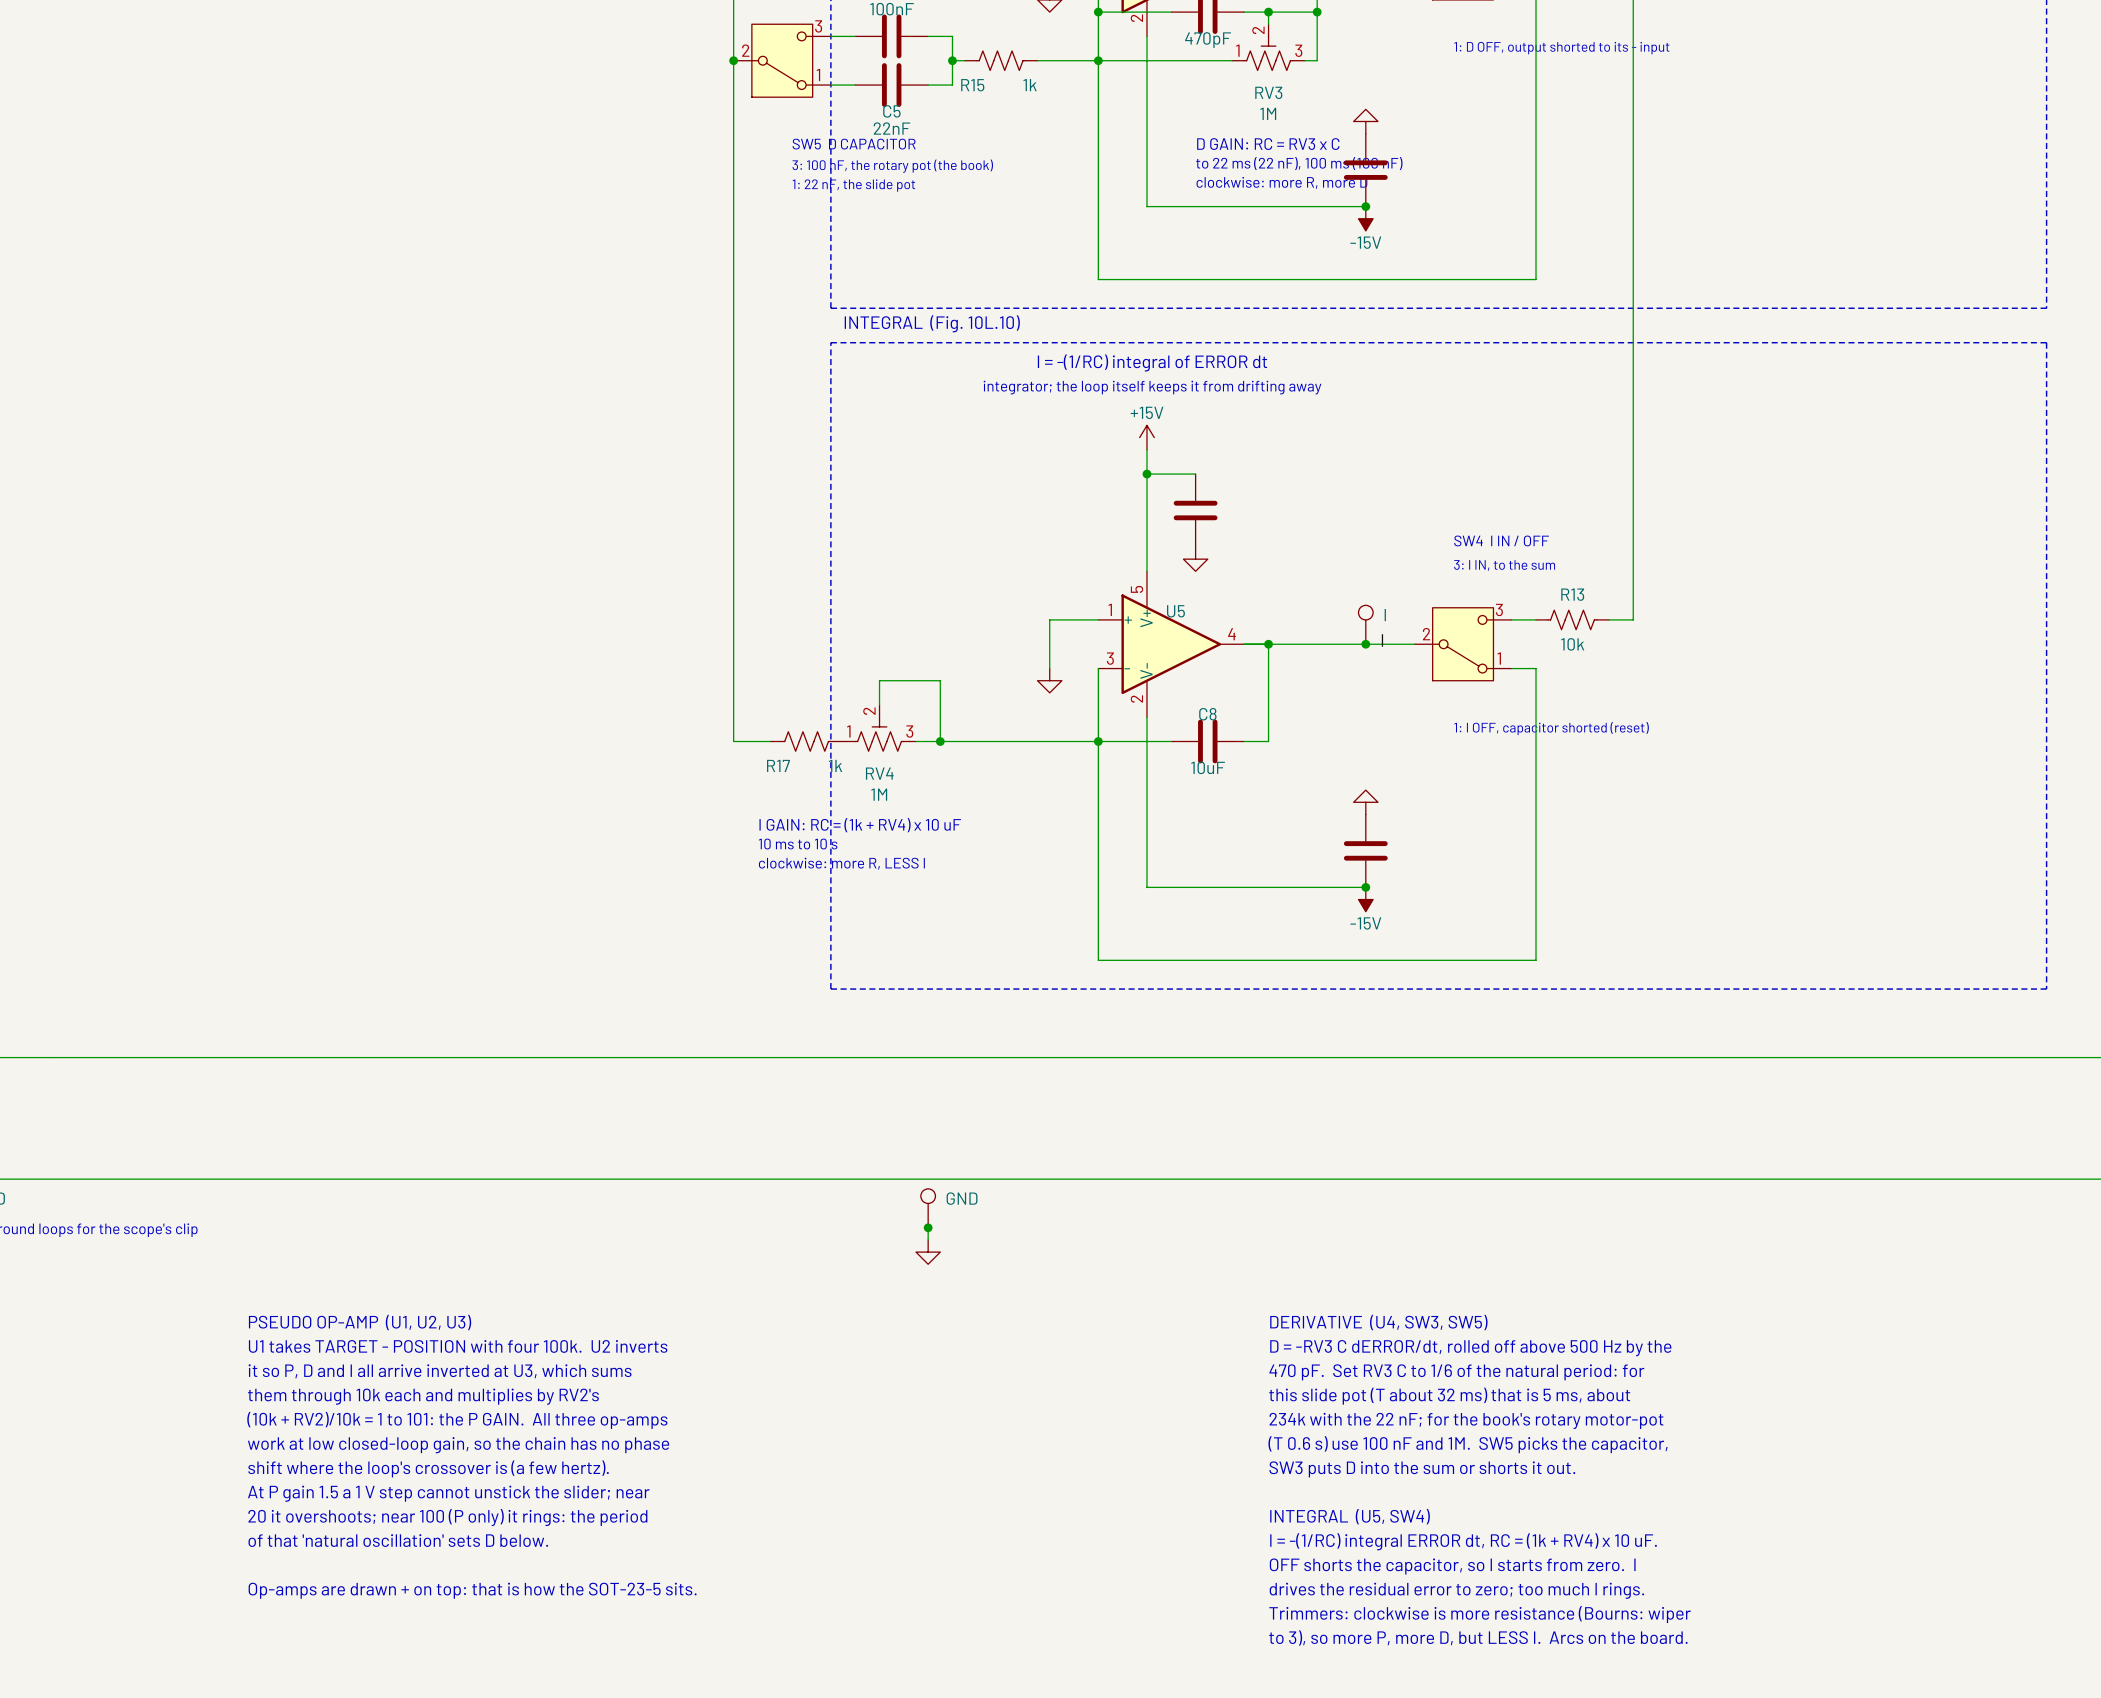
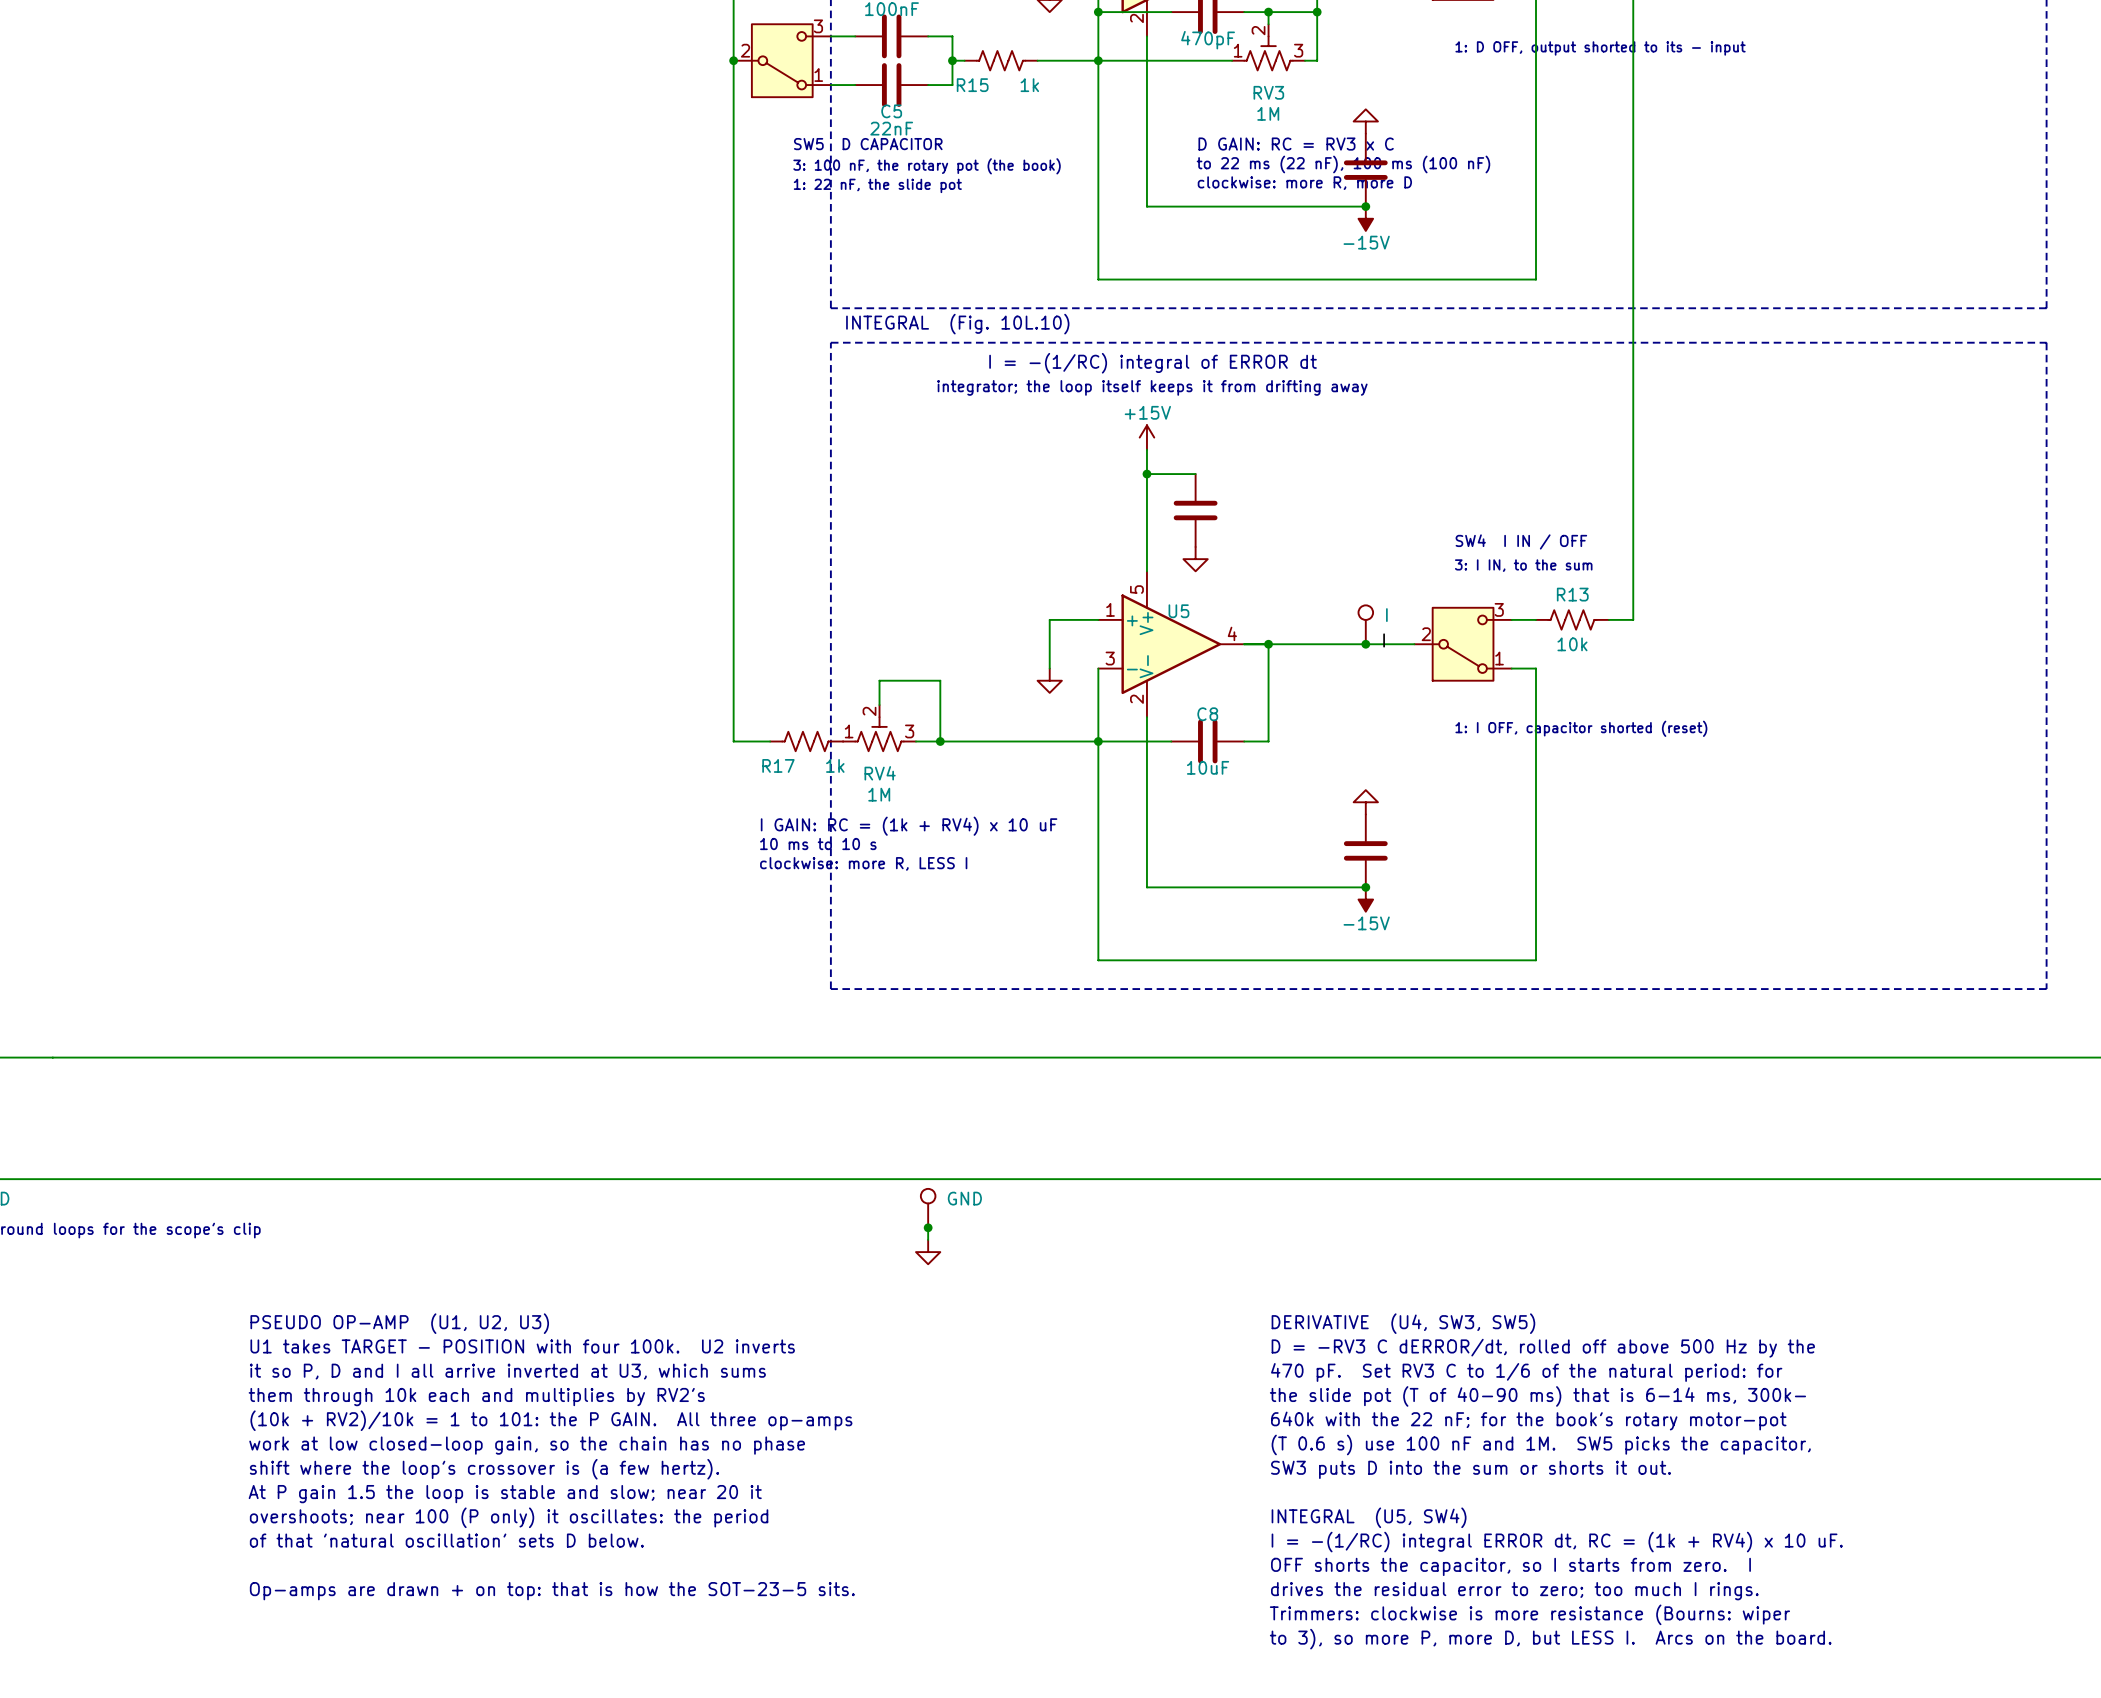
text: this slide pot (T about 32 ms) that is 5 ms, about (1449, 1396) -> the slide pot (T of 40-90 ms) that is 6-14 ms, 300k- (1537, 1396)
text: 234k with the 22 nF; for the book's rotary motor-pot (1466, 1420) -> 640k with the 22 nF; for the book's rotary motor-pot (1528, 1421)
text: At P gain 1.5 a 1 V step cannot unstick the slider; near (448, 1493) -> At P gain 1.5 the loop is stable and slow; near 20 it (505, 1494)
text: 20 it overshoots; near 100 (P only) it rings: the period (447, 1517) -> overshoots; near 100 (P only) it oscillates: the period (509, 1517)

